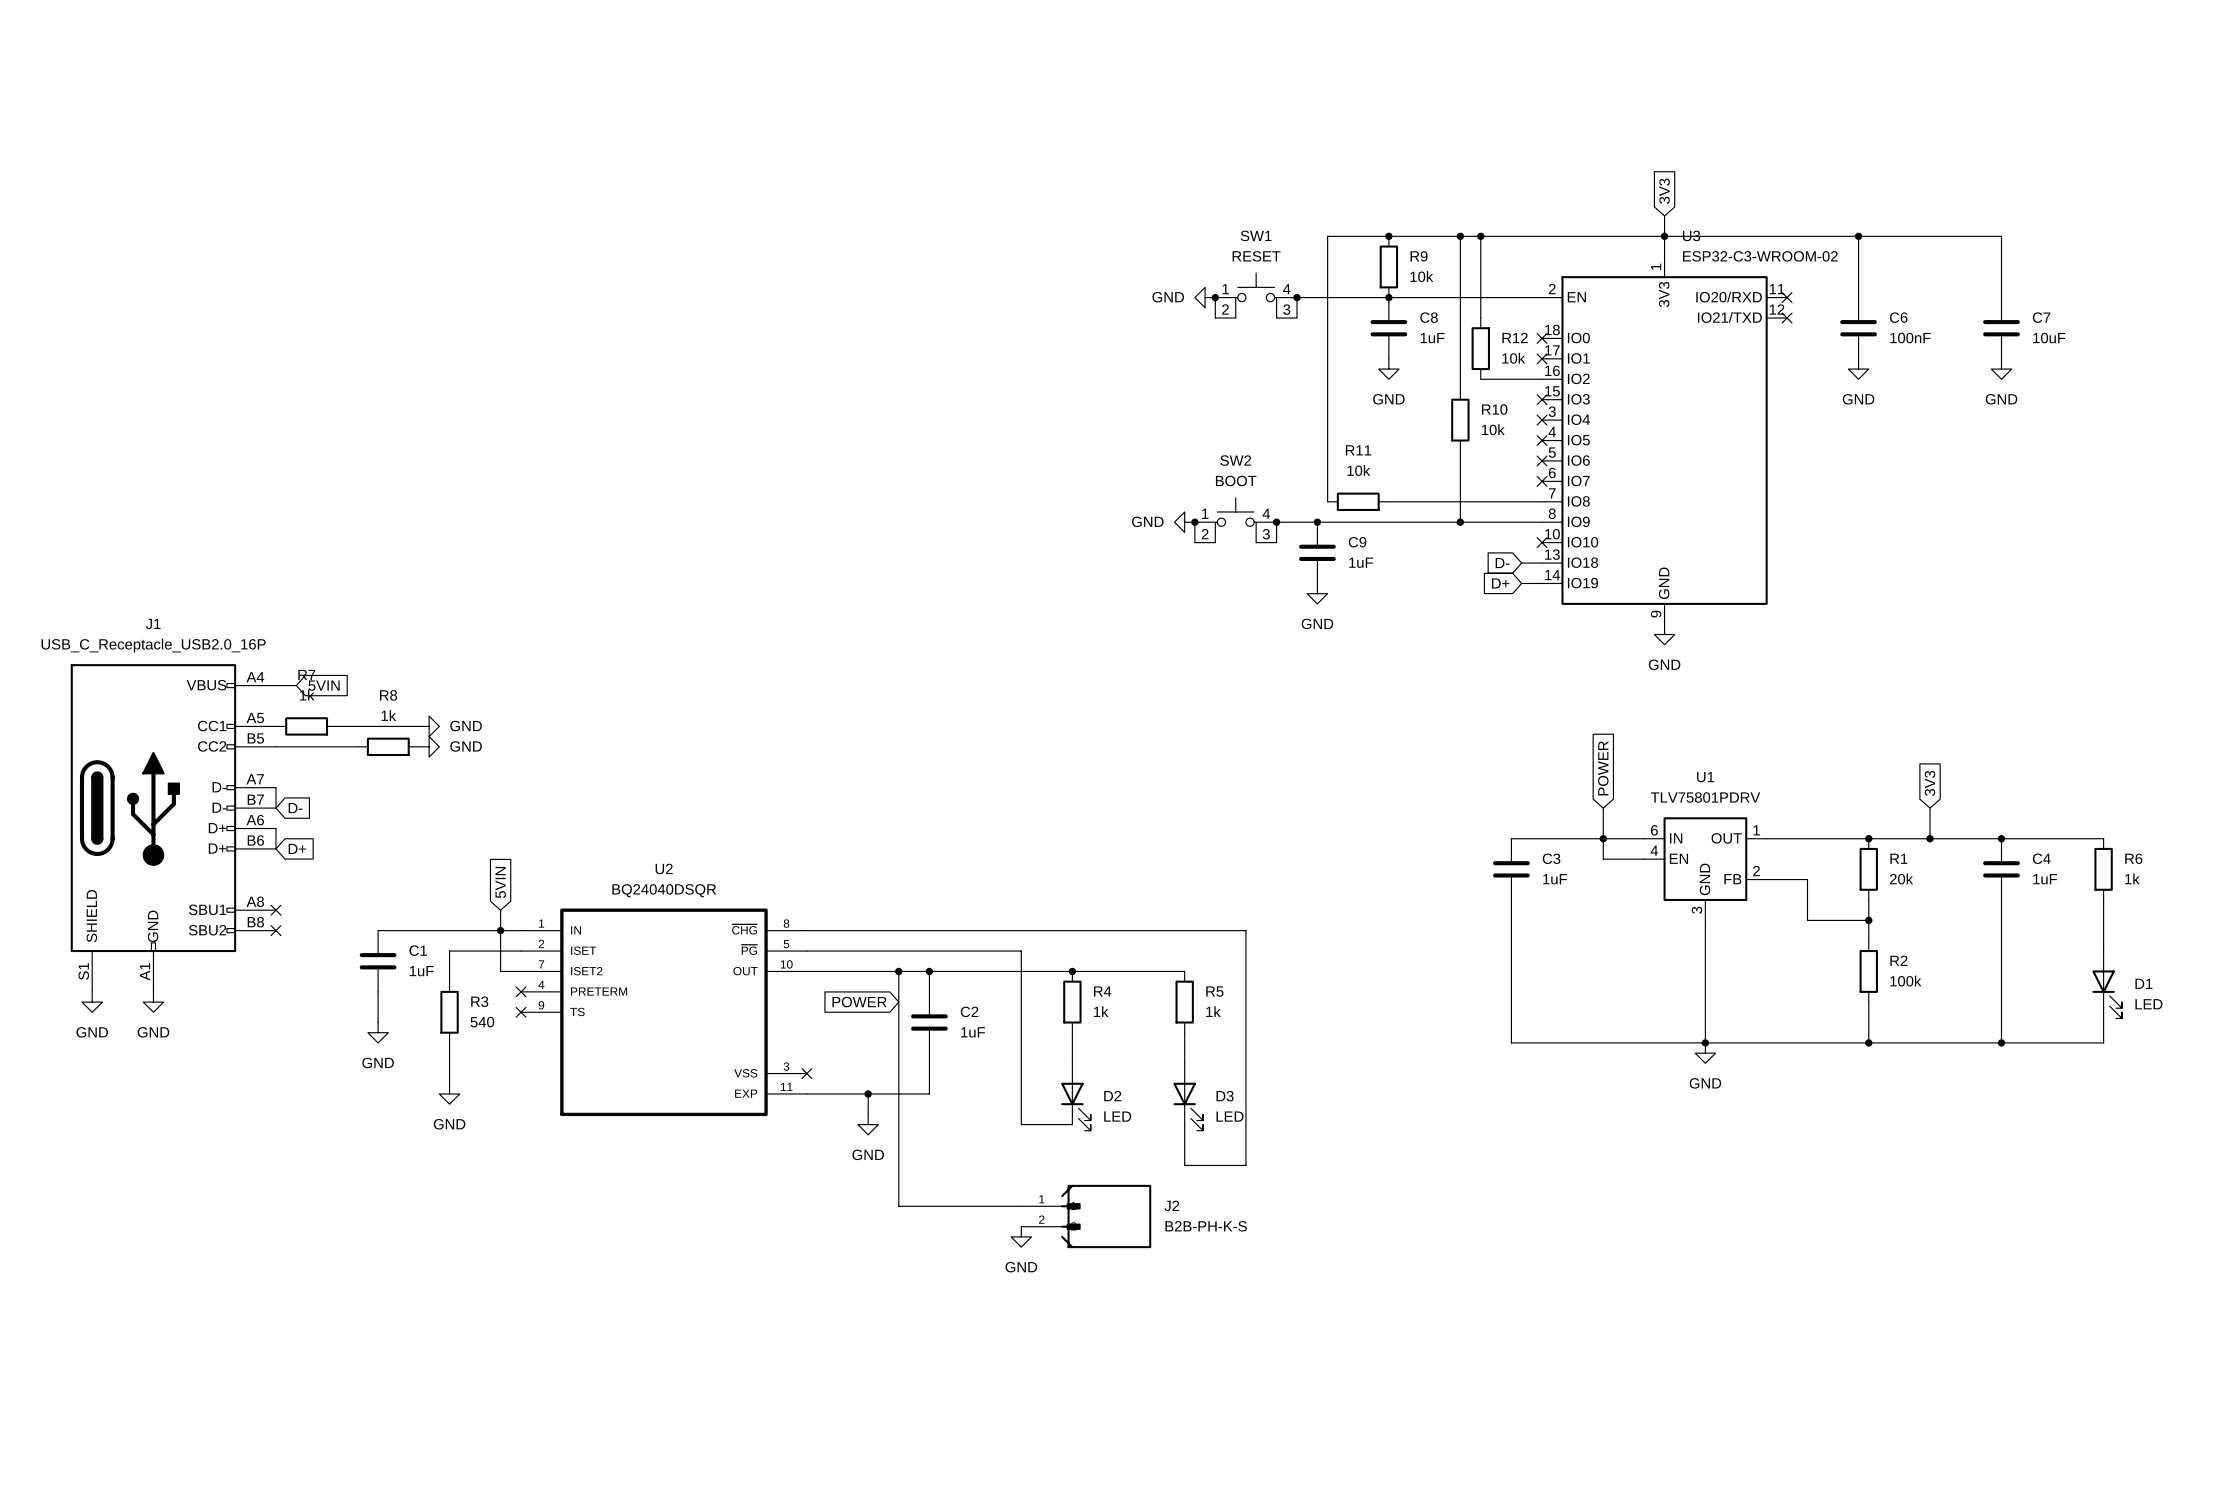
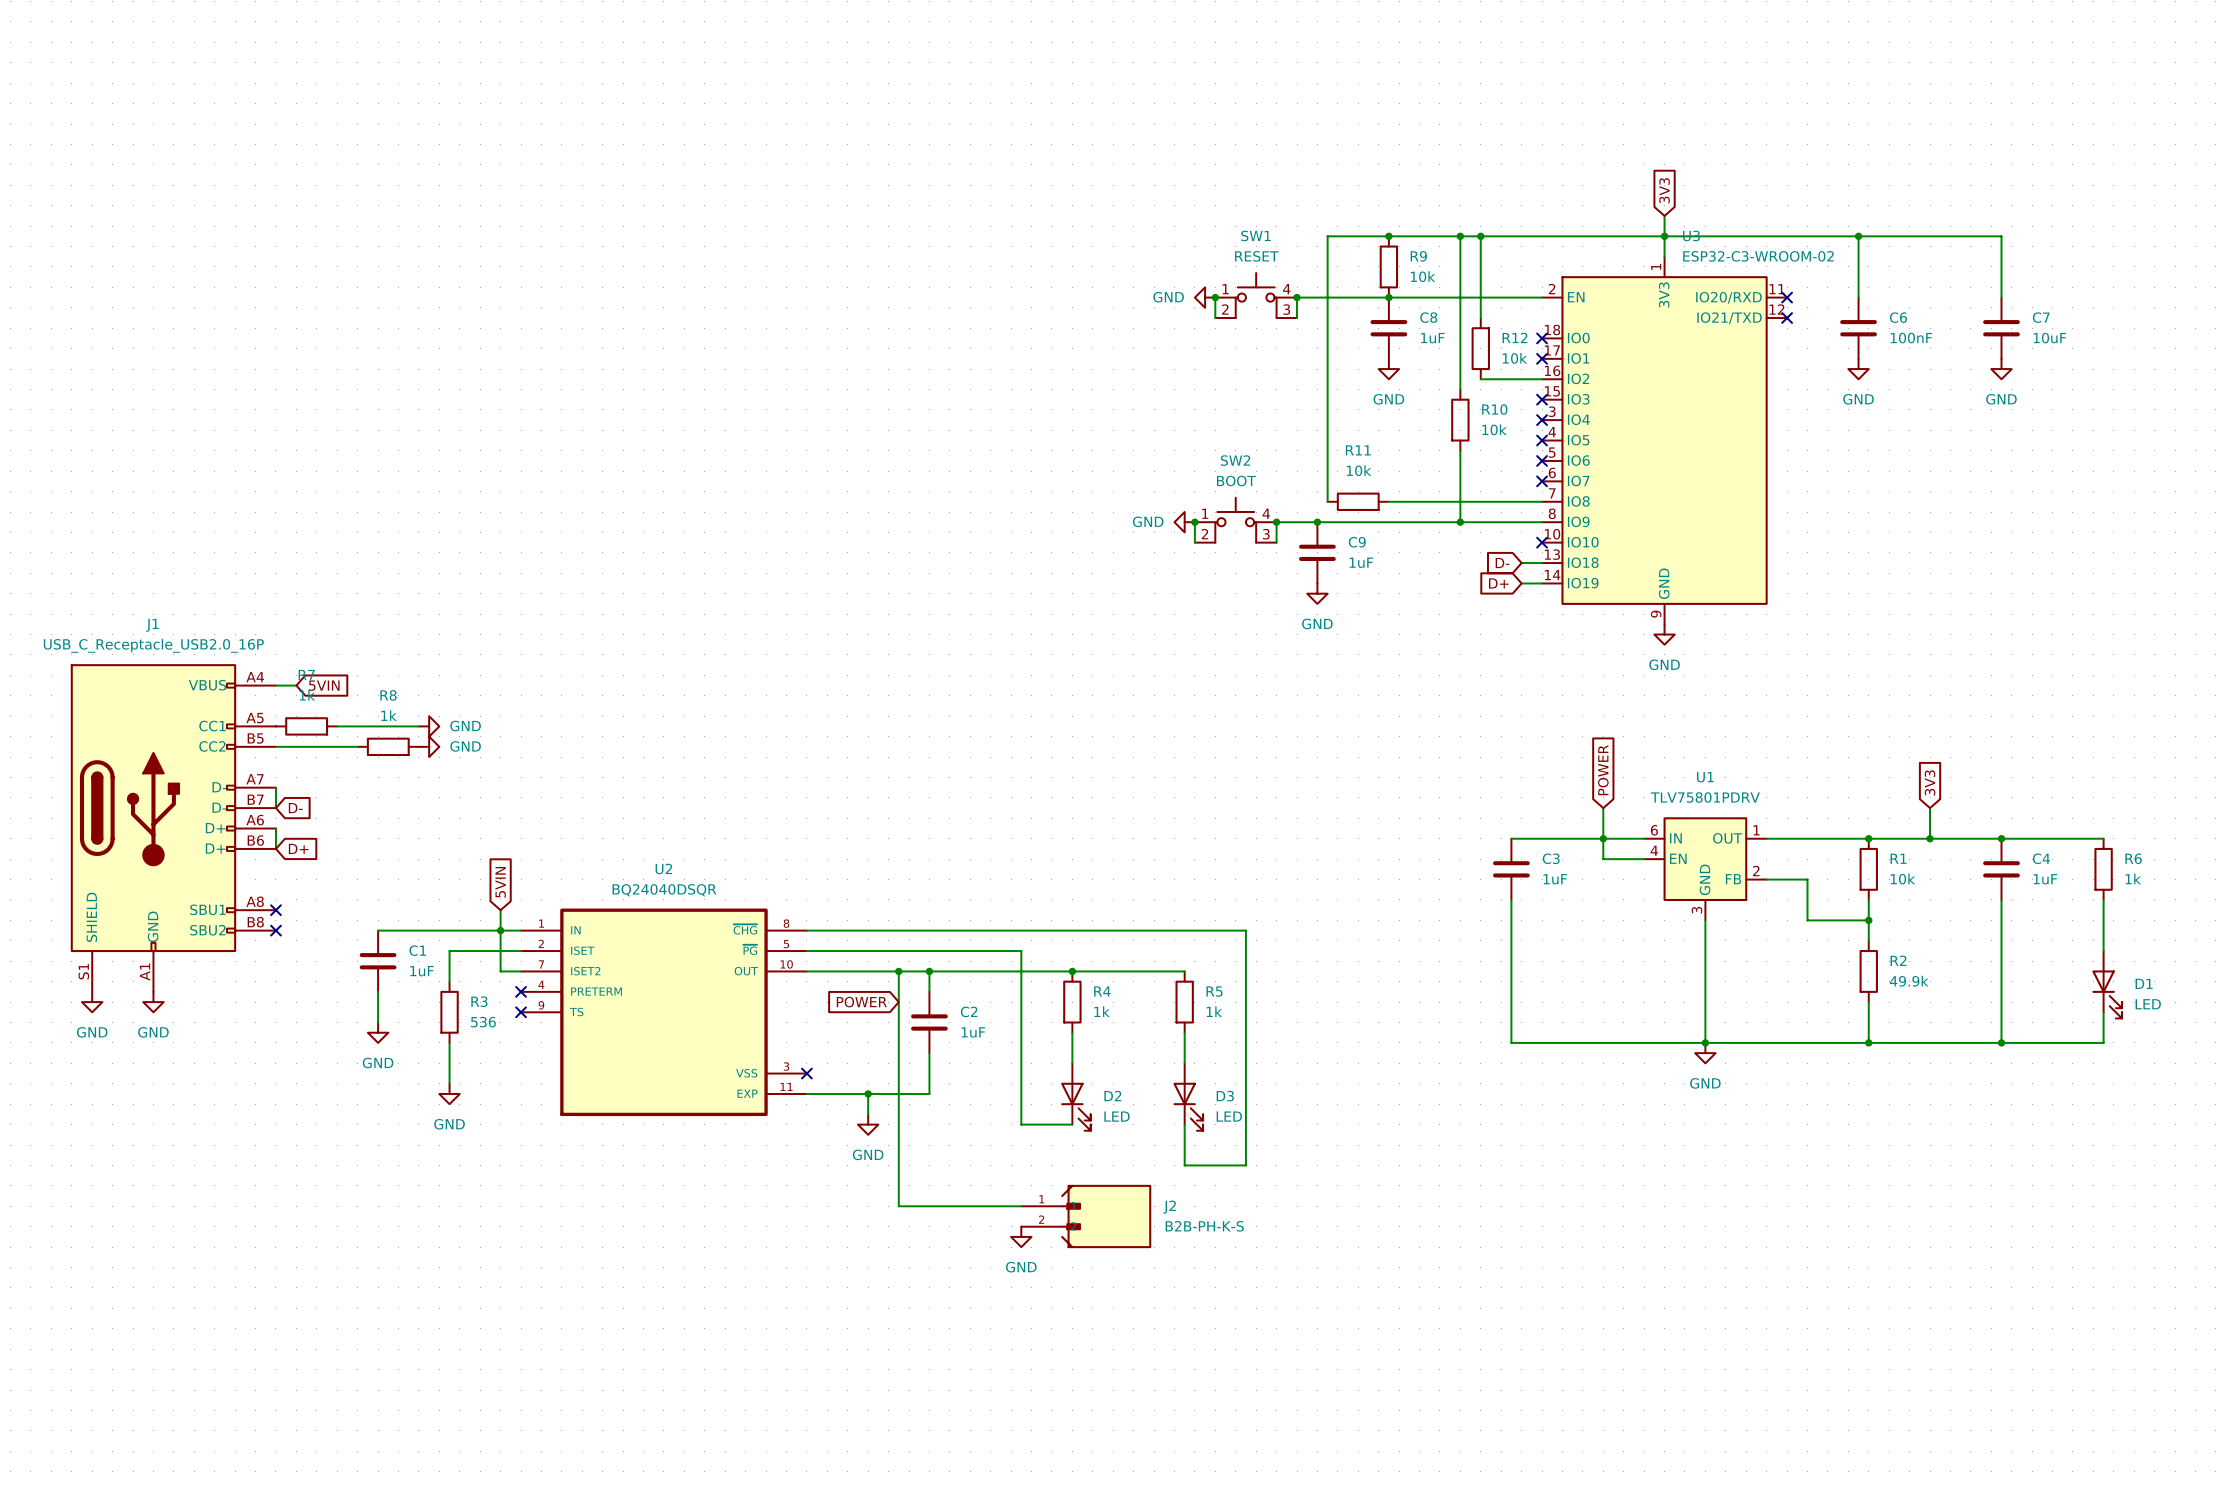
R1 value: 20k (1901, 878) -> 10k (1902, 879)
R2 value: 100k (1905, 981) -> 49.9k (1909, 981)
R3 value: 540 (482, 1022) -> 536 (483, 1022)

